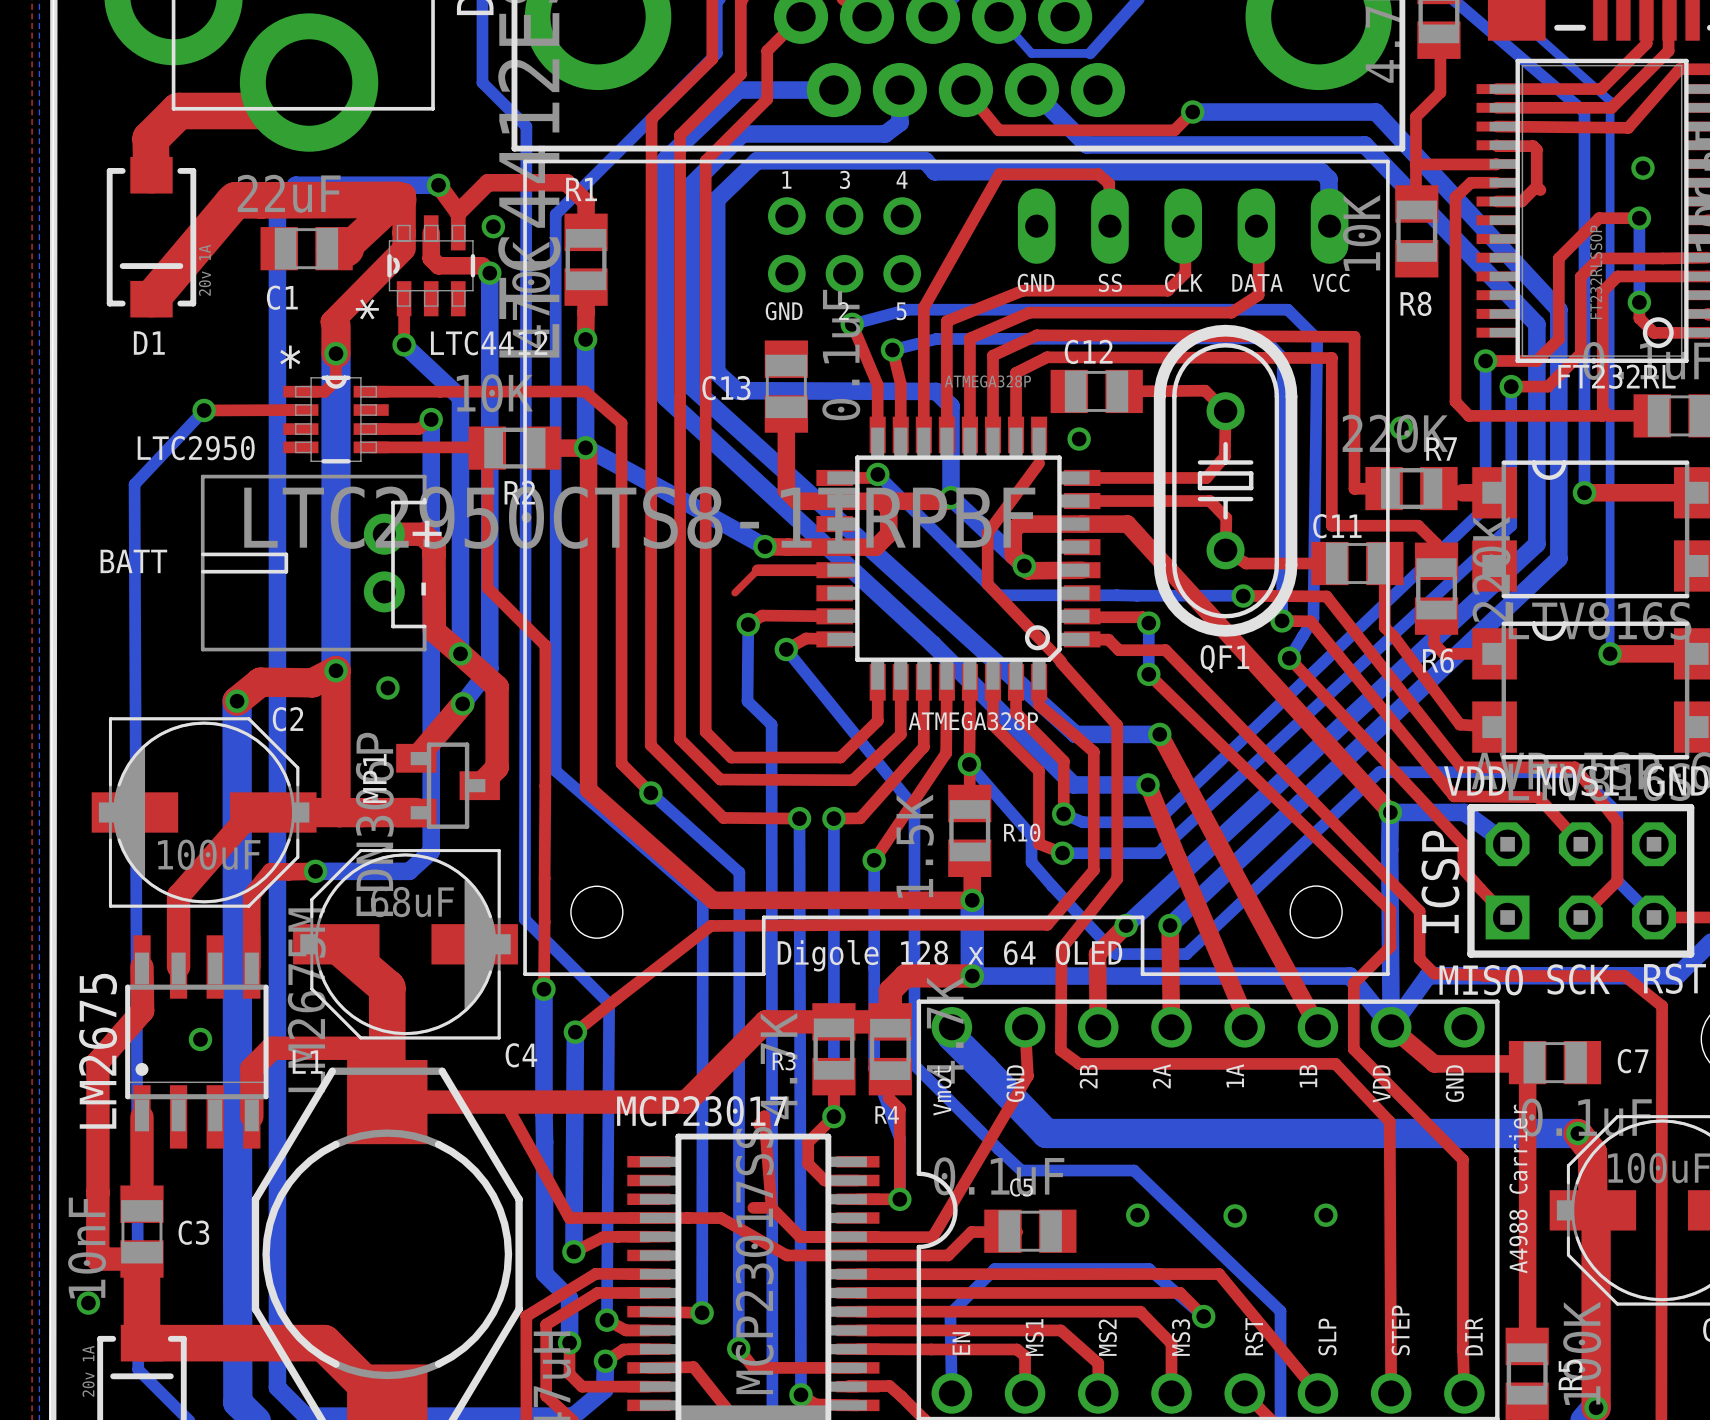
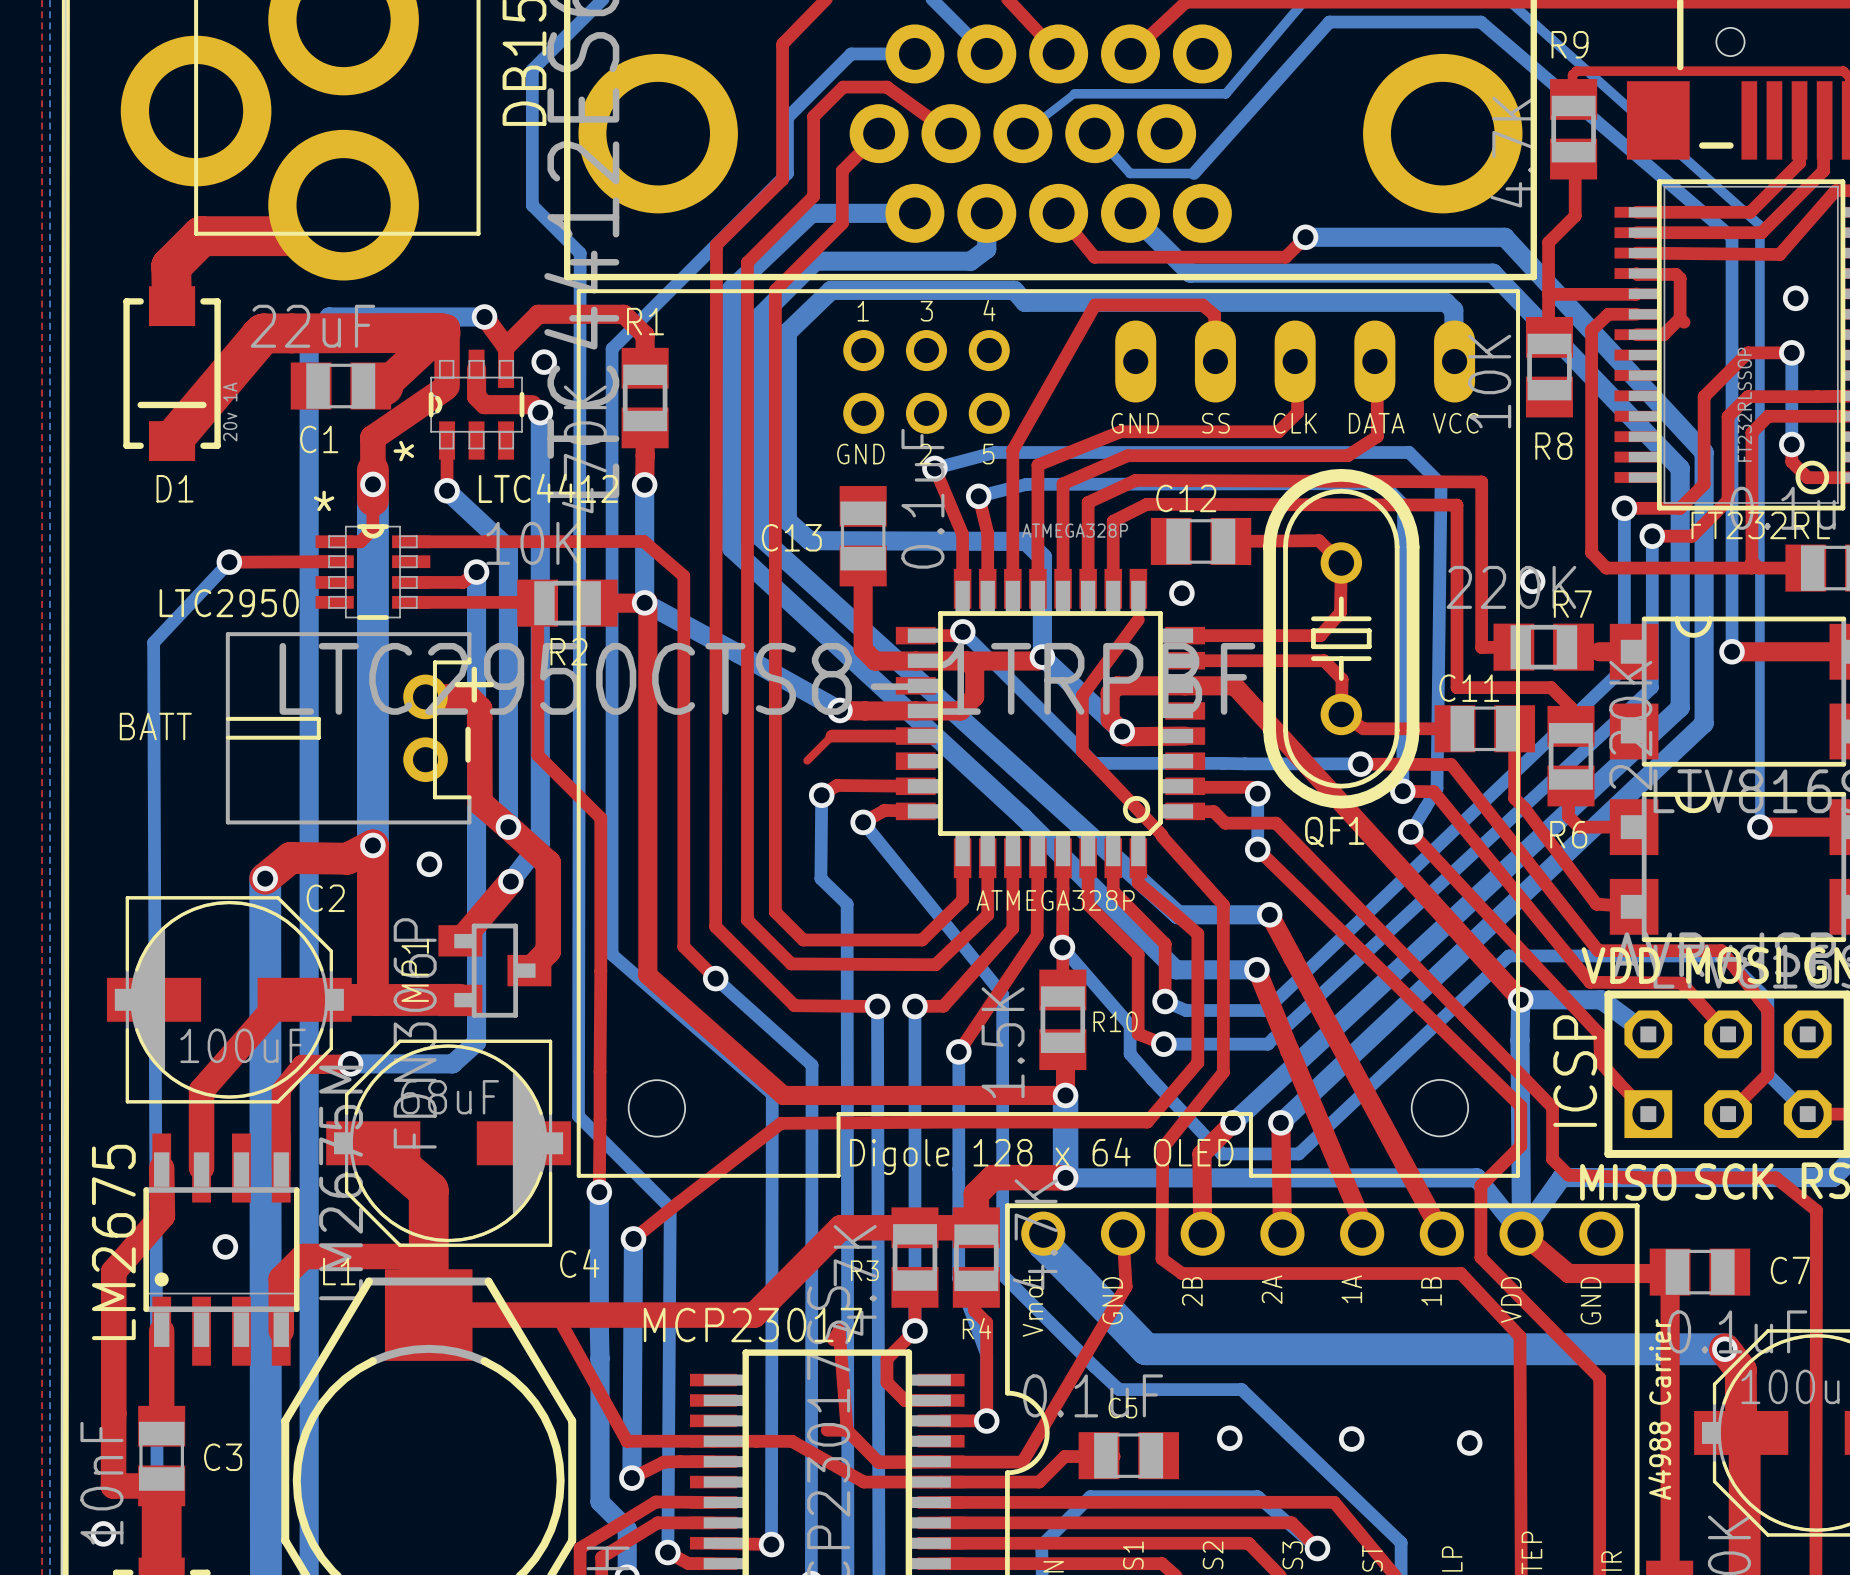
top track: (401, 251) (332, 321) (336, 325) -> (444, 388) (372, 437) (372, 469)
via position: (336, 353) -> (372, 484)
via position: (1137, 1215) -> (1229, 1438)
via position: (1325, 1215) -> (1469, 1443)

